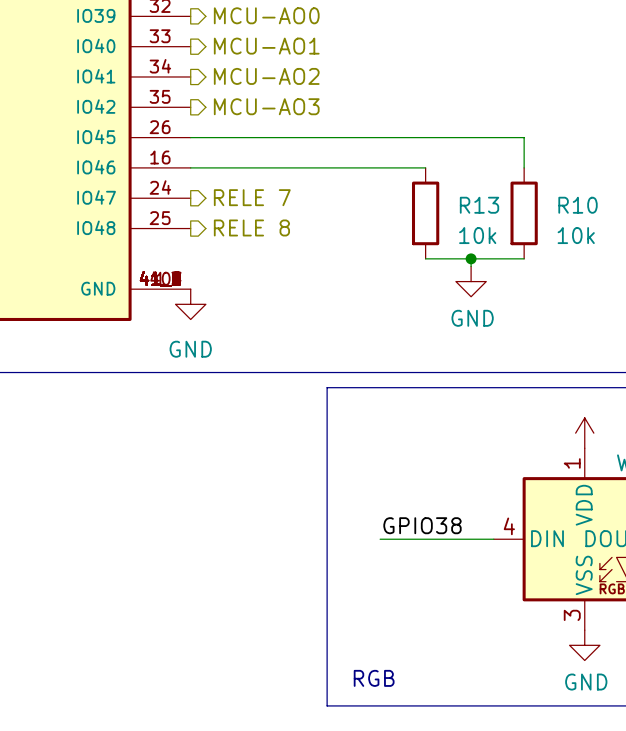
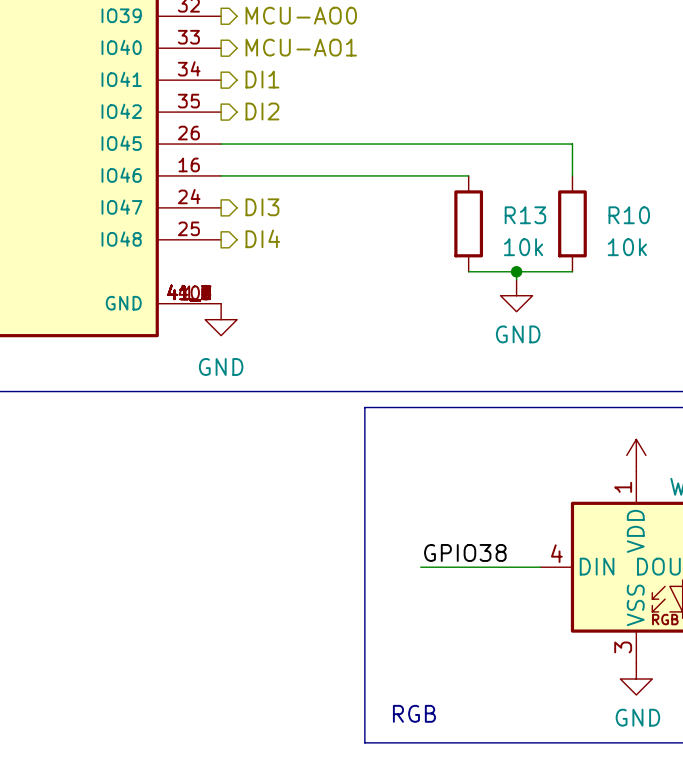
hierarchical label: MCU-AO2 (266, 76) -> DI1 (262, 79)
hierarchical label: MCU-AO3 (266, 106) -> DI2 (262, 111)
hierarchical label: RELE 7 (252, 197) -> DI3 (262, 207)
hierarchical label: RELE 8 (251, 227) -> DI4 (262, 238)

